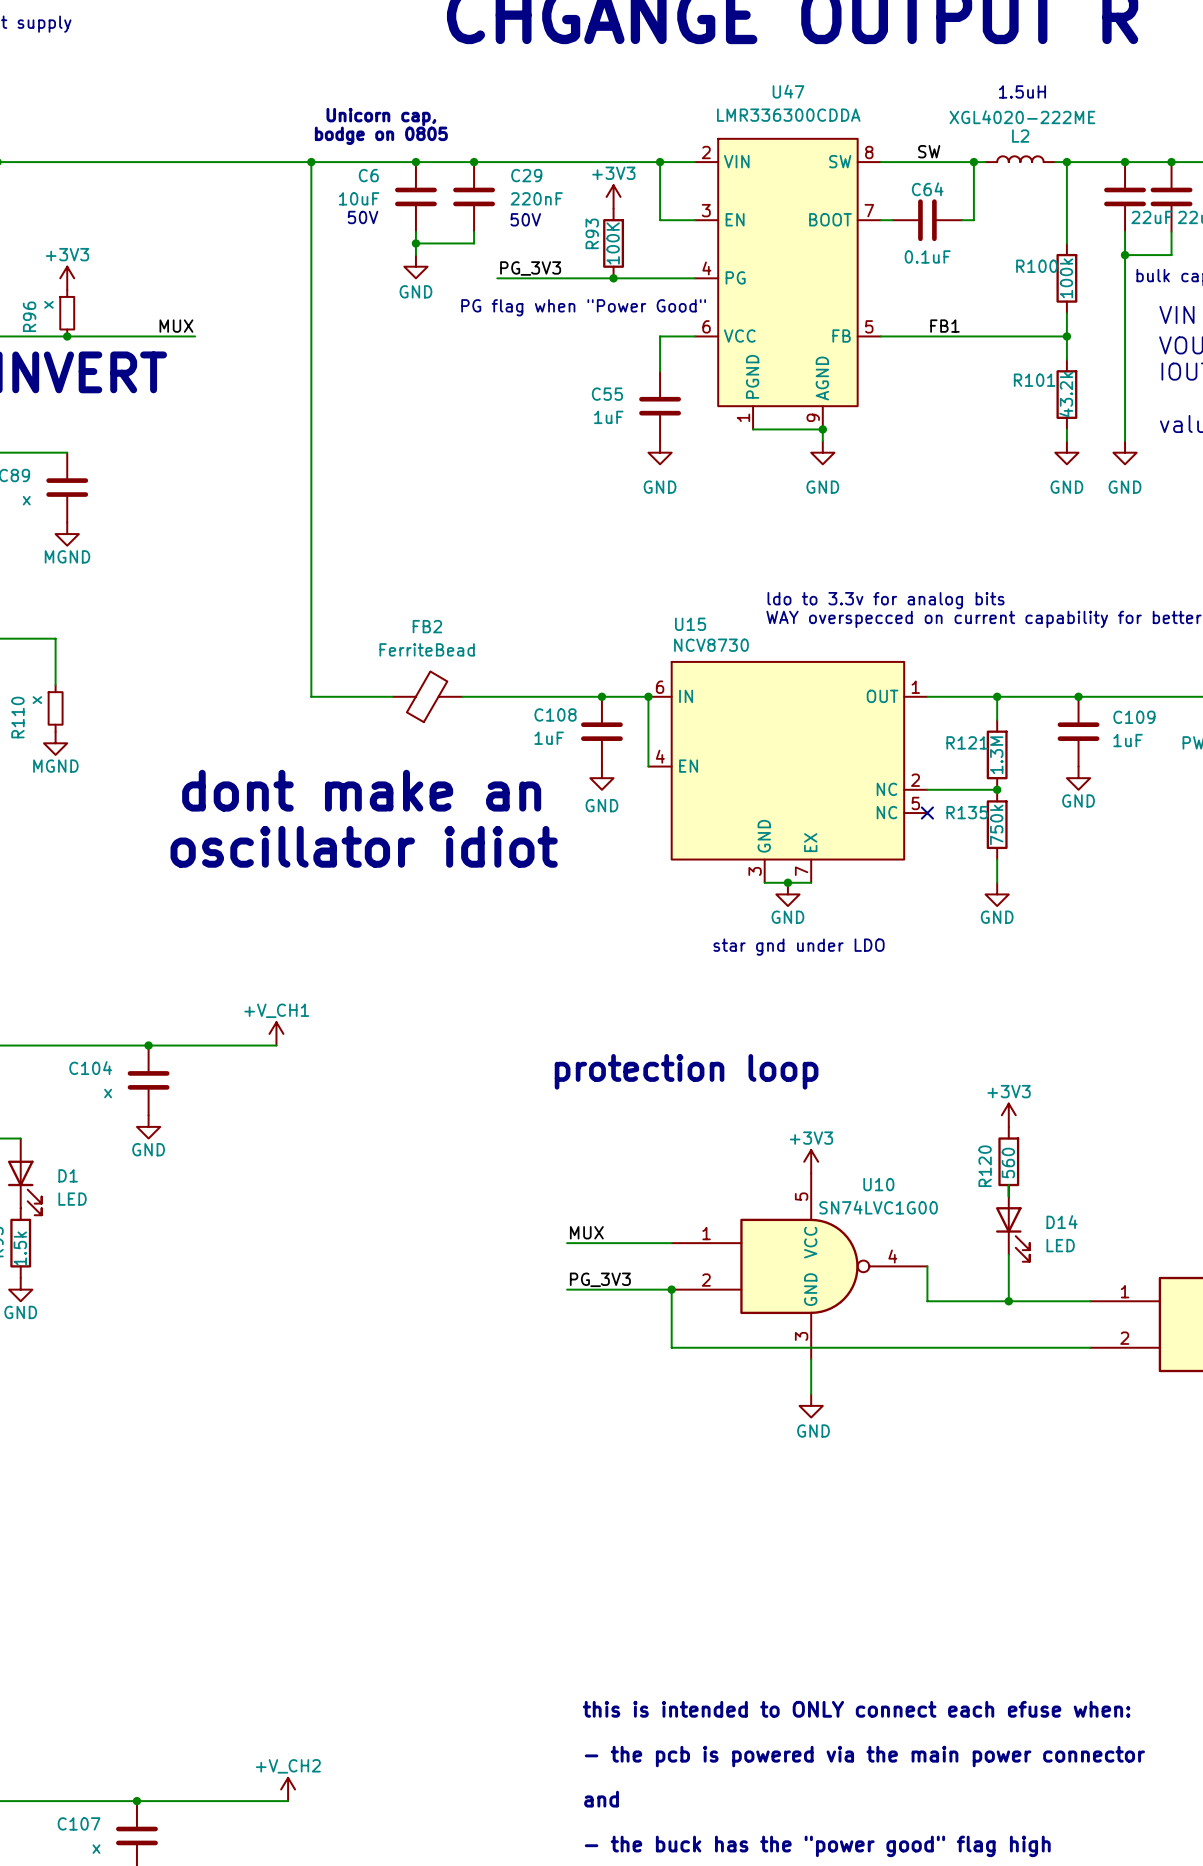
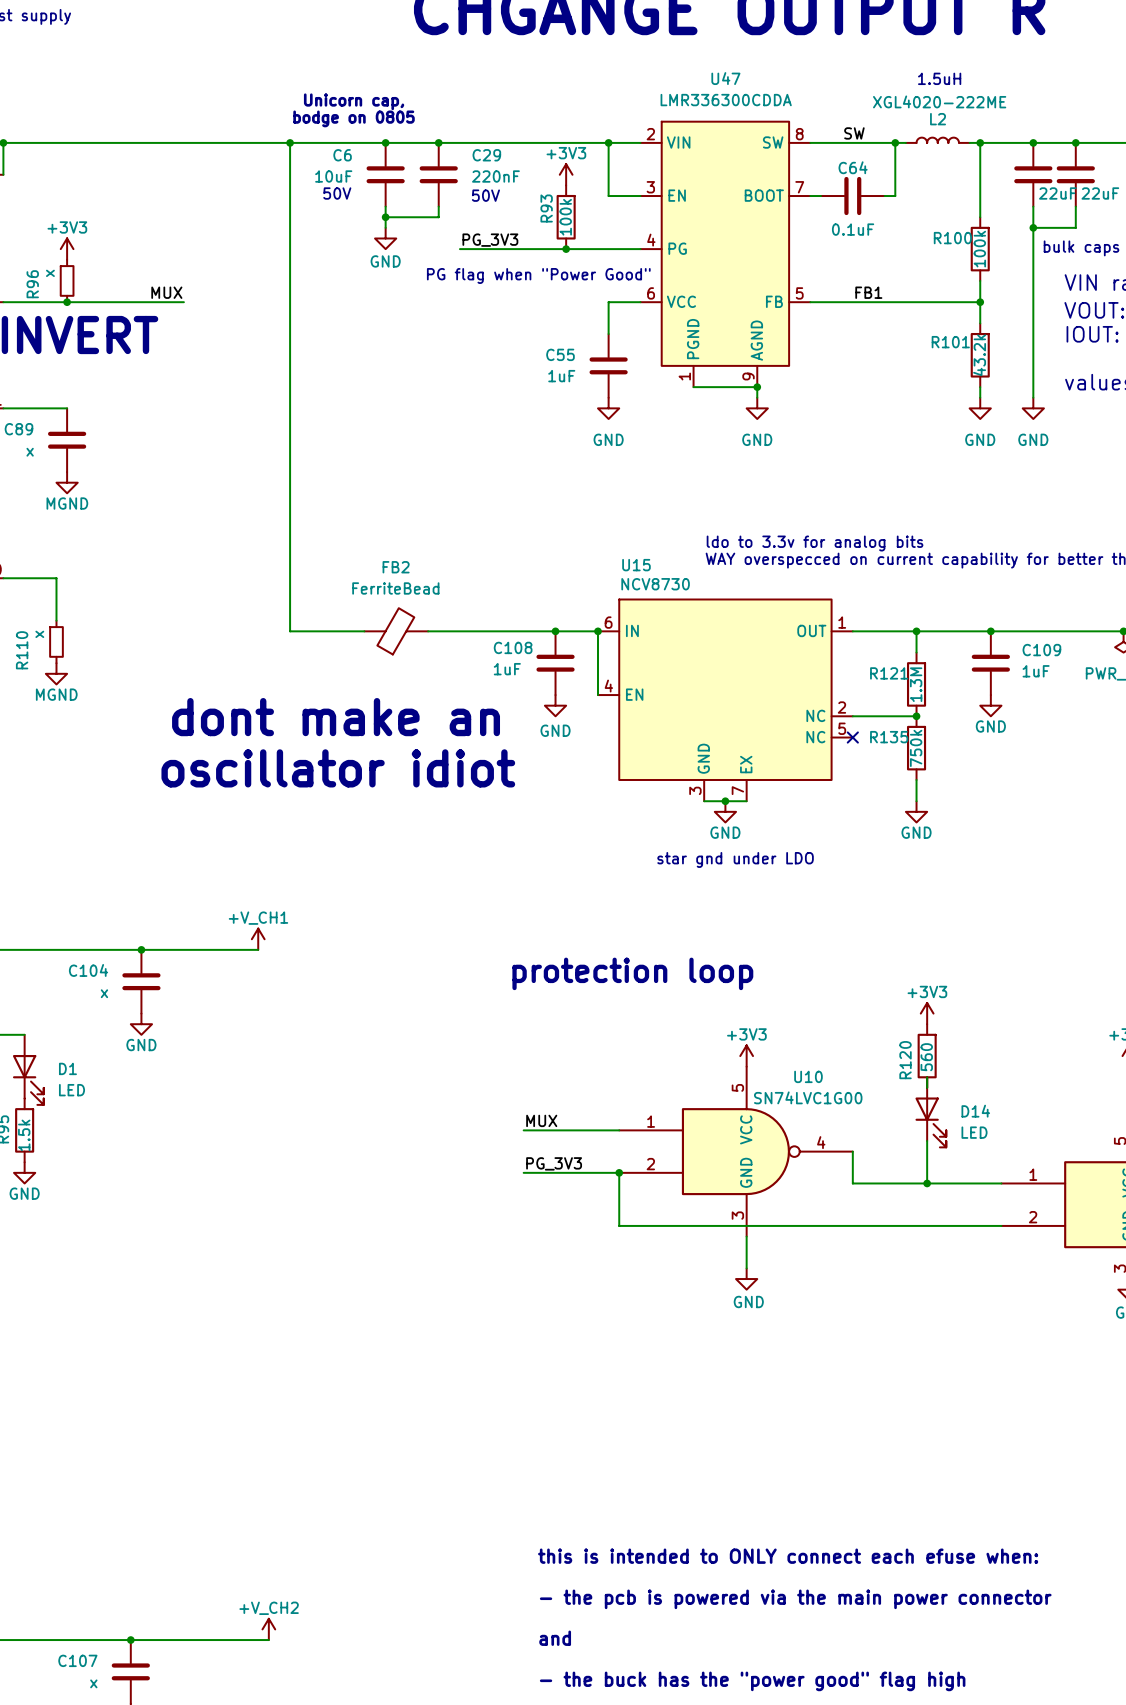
R93 value: 100K (613, 243) -> 100k (565, 217)

